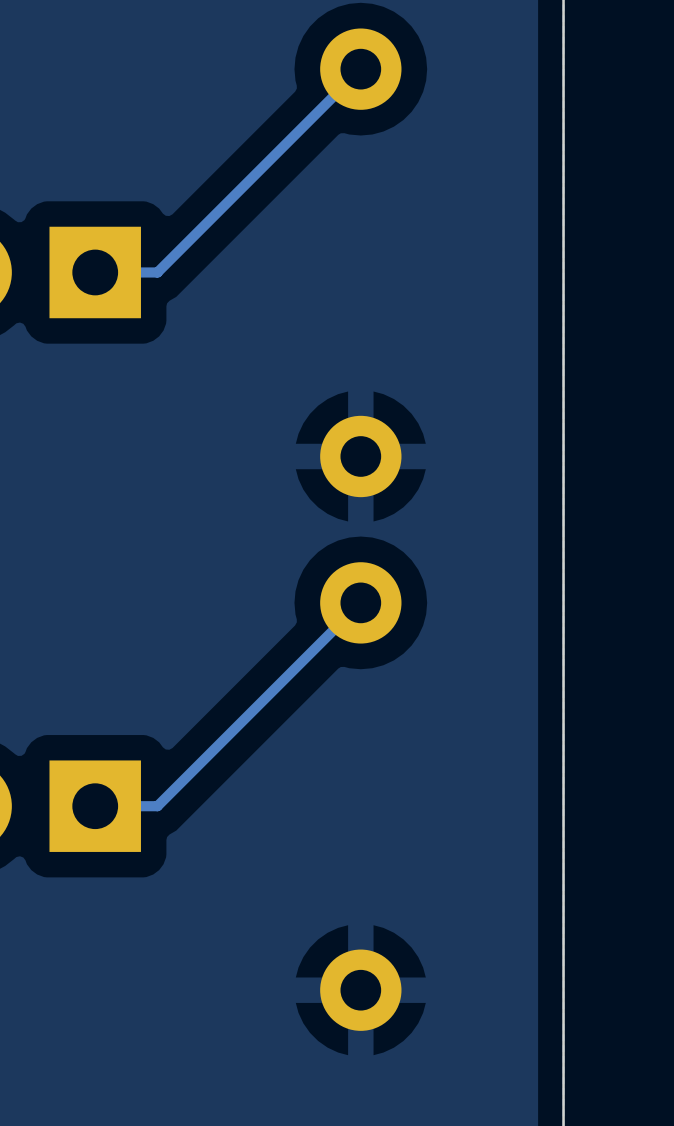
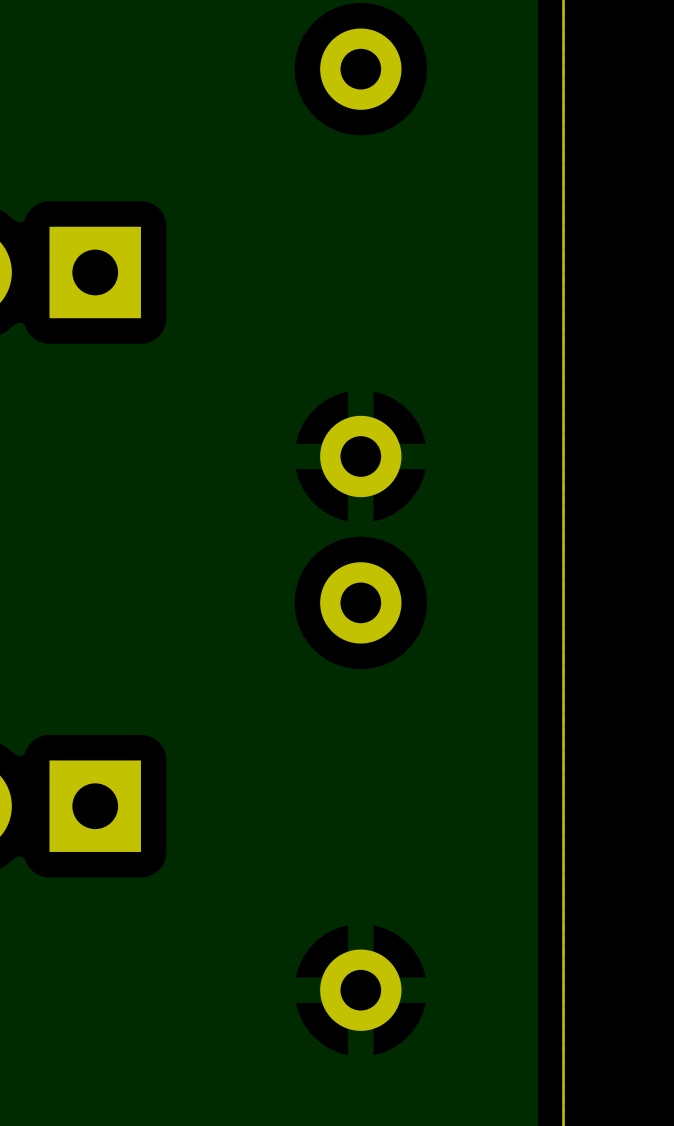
track: (360, 69) (157, 272) (95, 272) -> none
track: (360, 602) (157, 806) (95, 806) -> none

